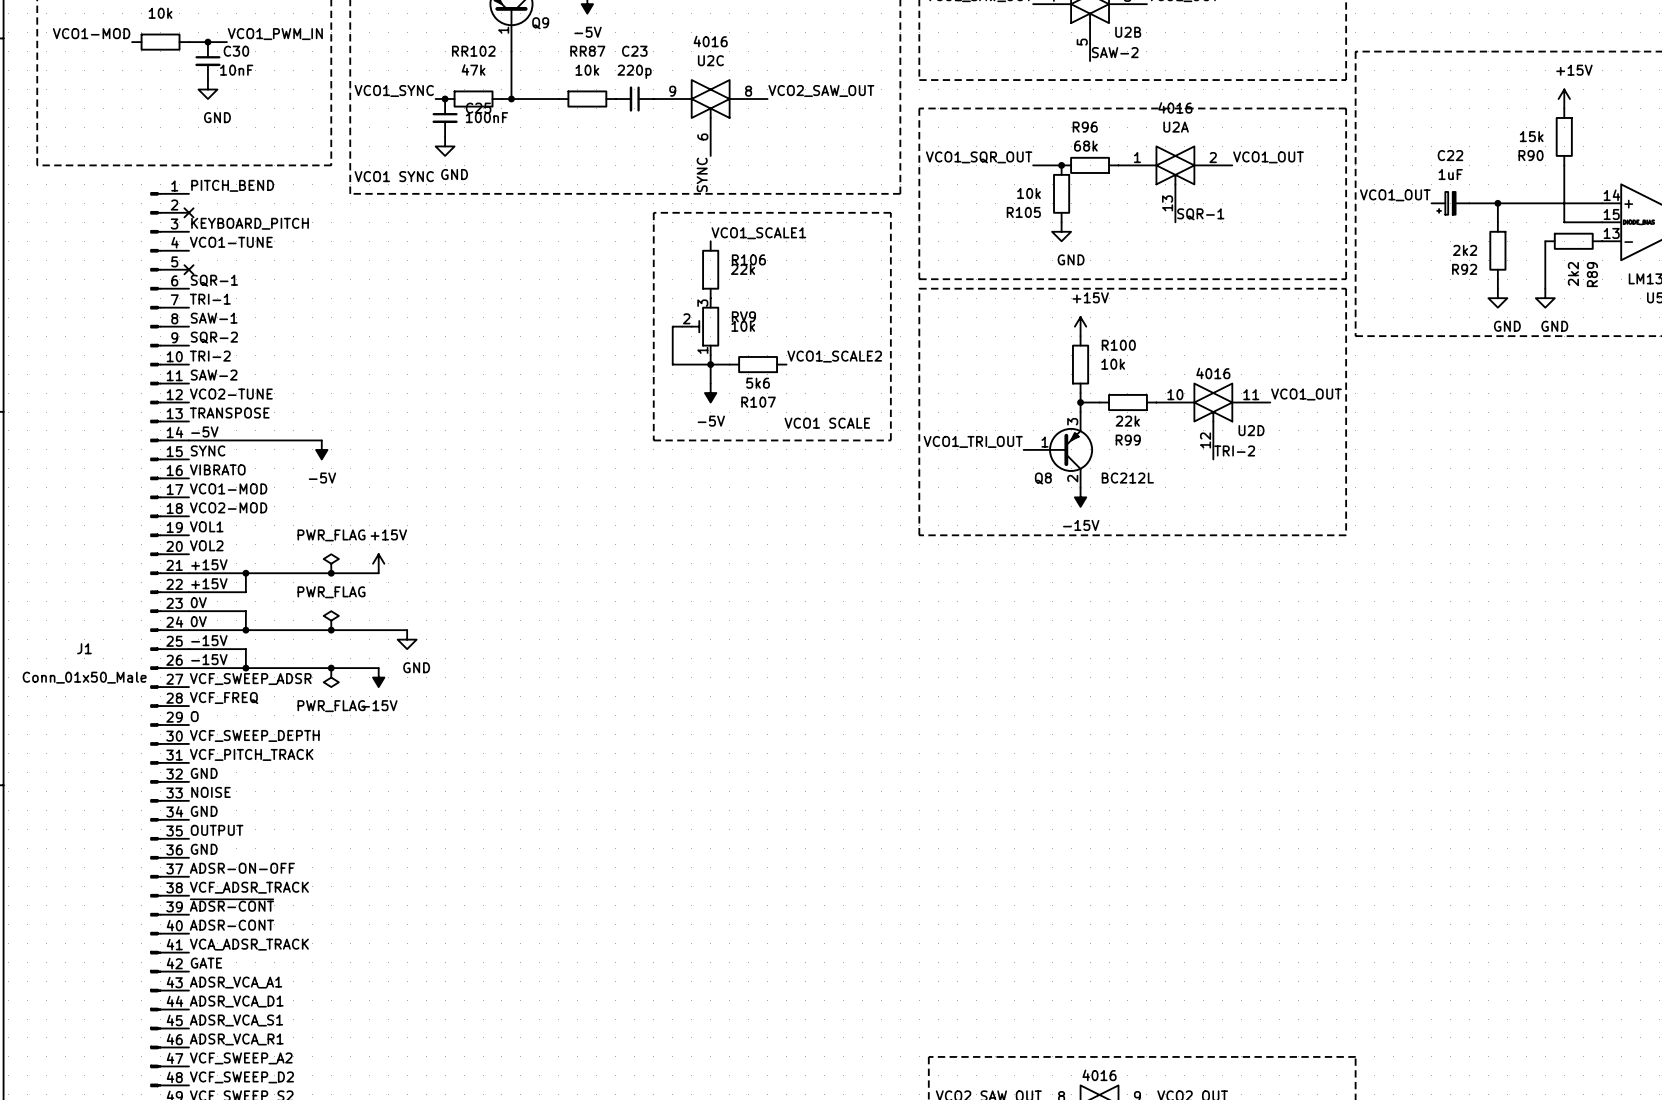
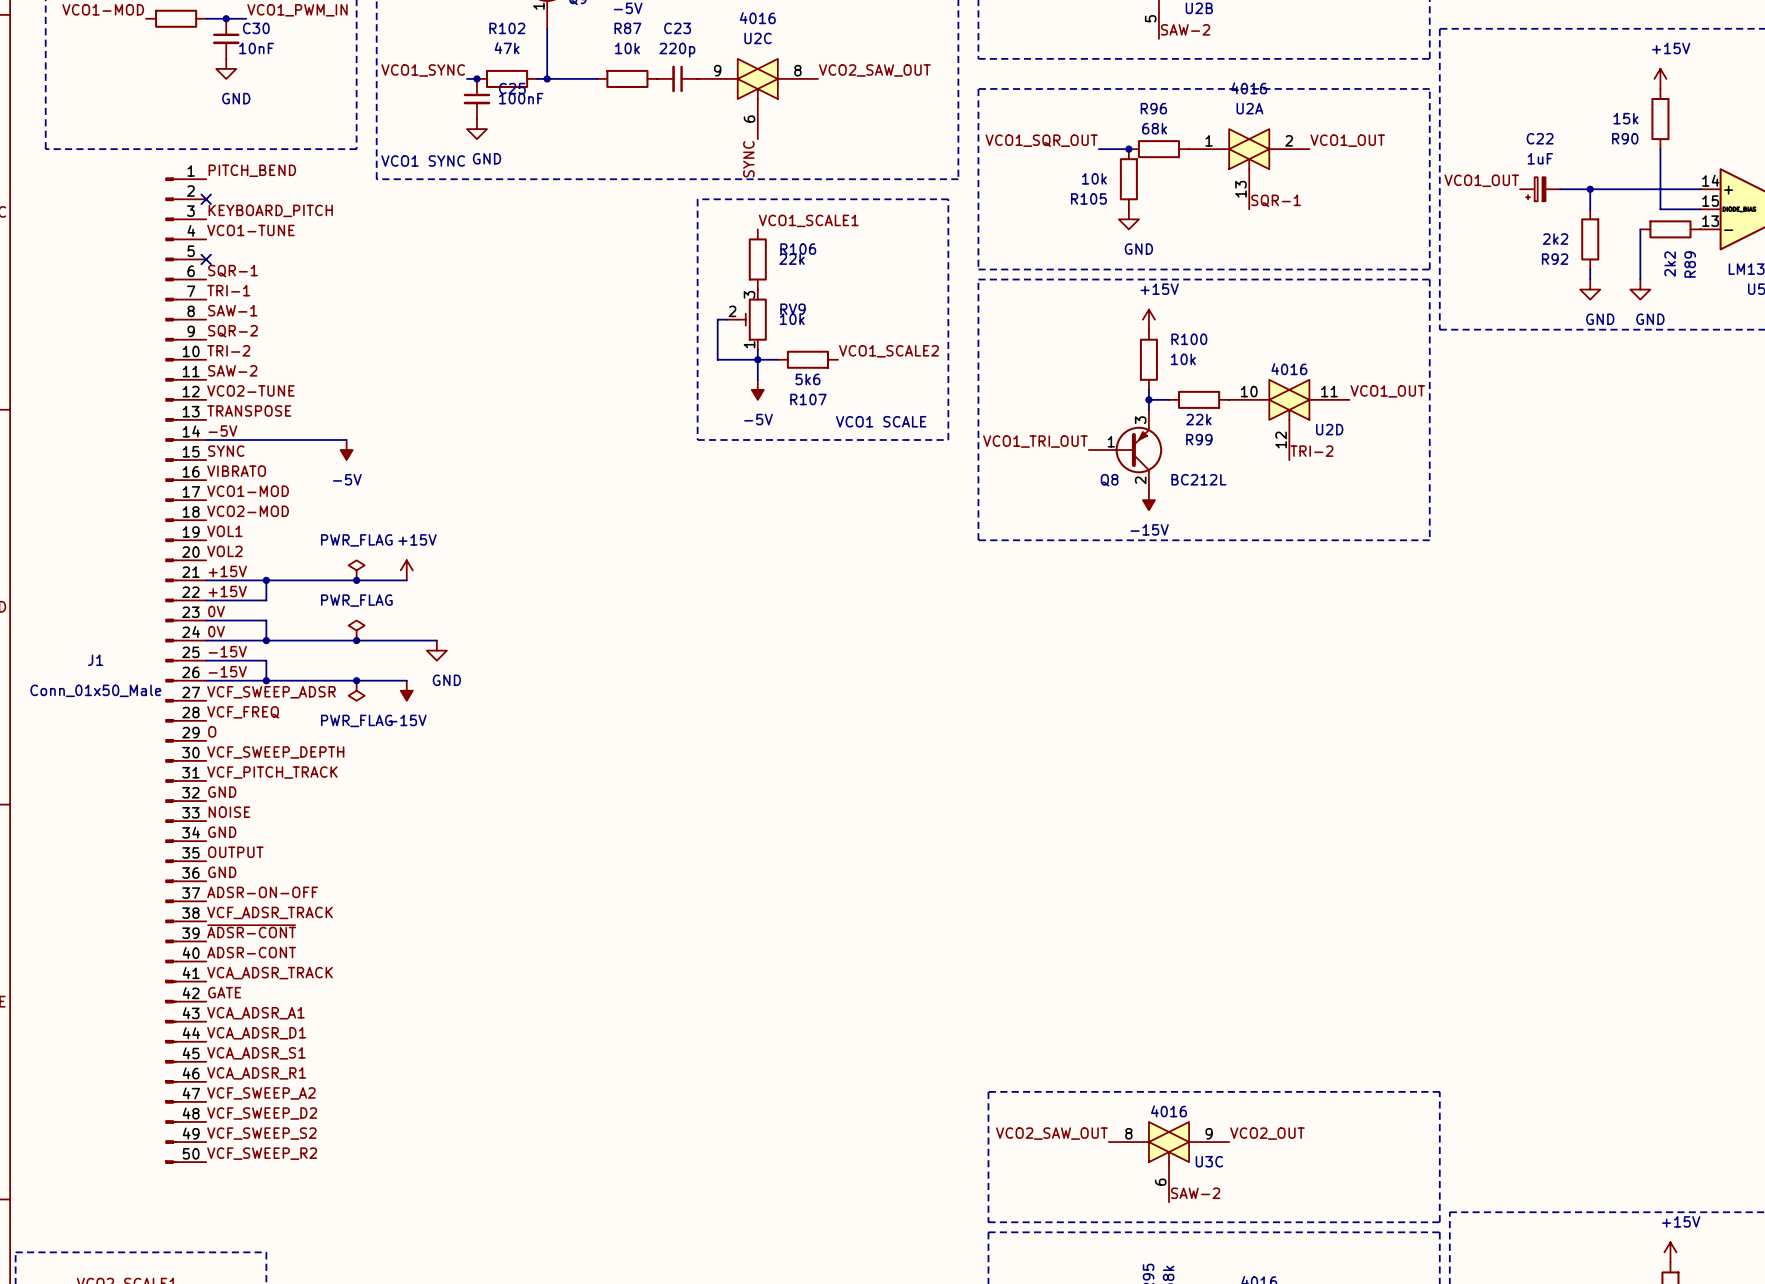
RR102 name: RR102 (473, 51) -> R102 (507, 28)
RR87 name: RR87 (587, 51) -> R87 (627, 28)
label: ADSR_VCA_A1 (236, 982) -> VCA_ADSR_A1 (255, 1013)
label: ADSR_VCA_D1 (236, 1001) -> VCA_ADSR_D1 (256, 1033)
label: ADSR_VCA_S1 (236, 1020) -> VCA_ADSR_S1 (256, 1053)
label: ADSR_VCA_R1 (236, 1039) -> VCA_ADSR_R1 (256, 1073)

